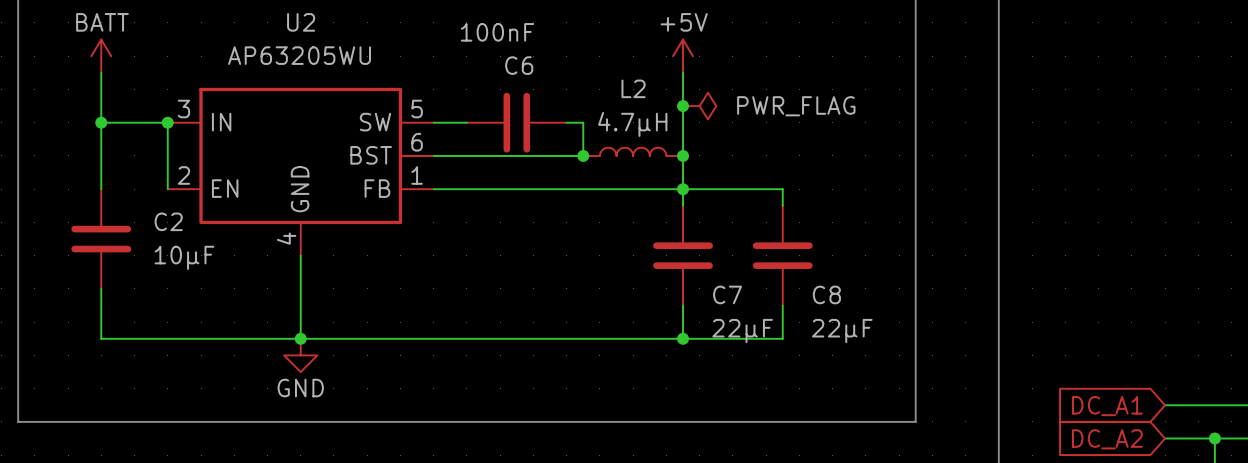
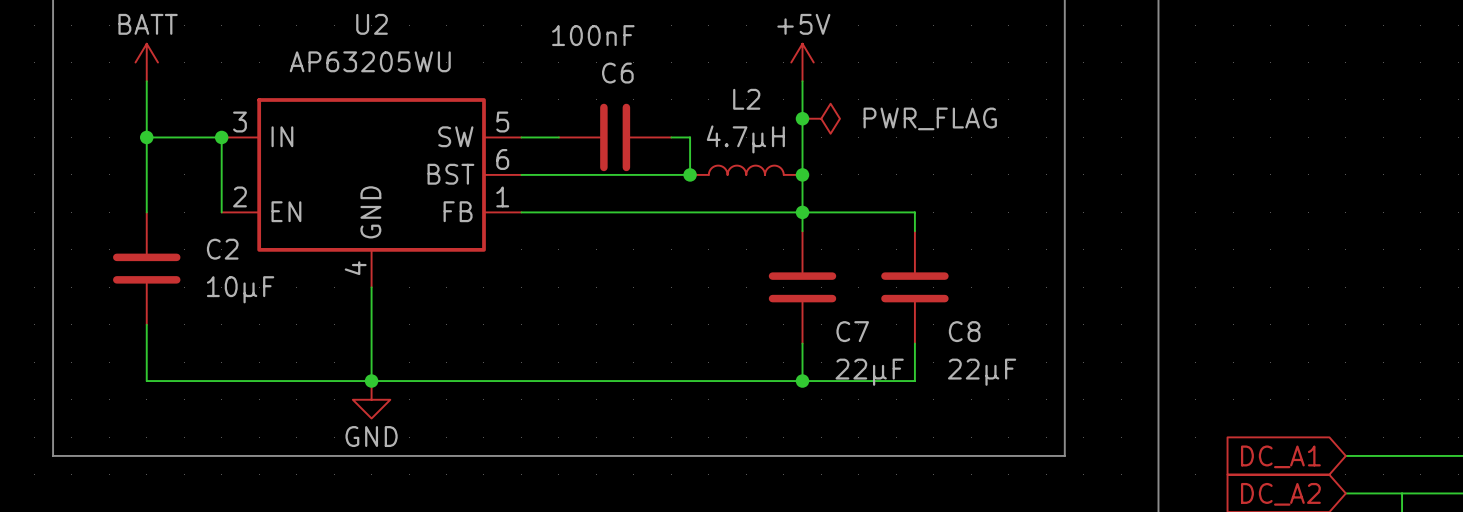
line: (18, 405) (18, 421) (915, 421) (915, 405) -> (53, 455) (1064, 455)
junction: (1214, 438) -> none

